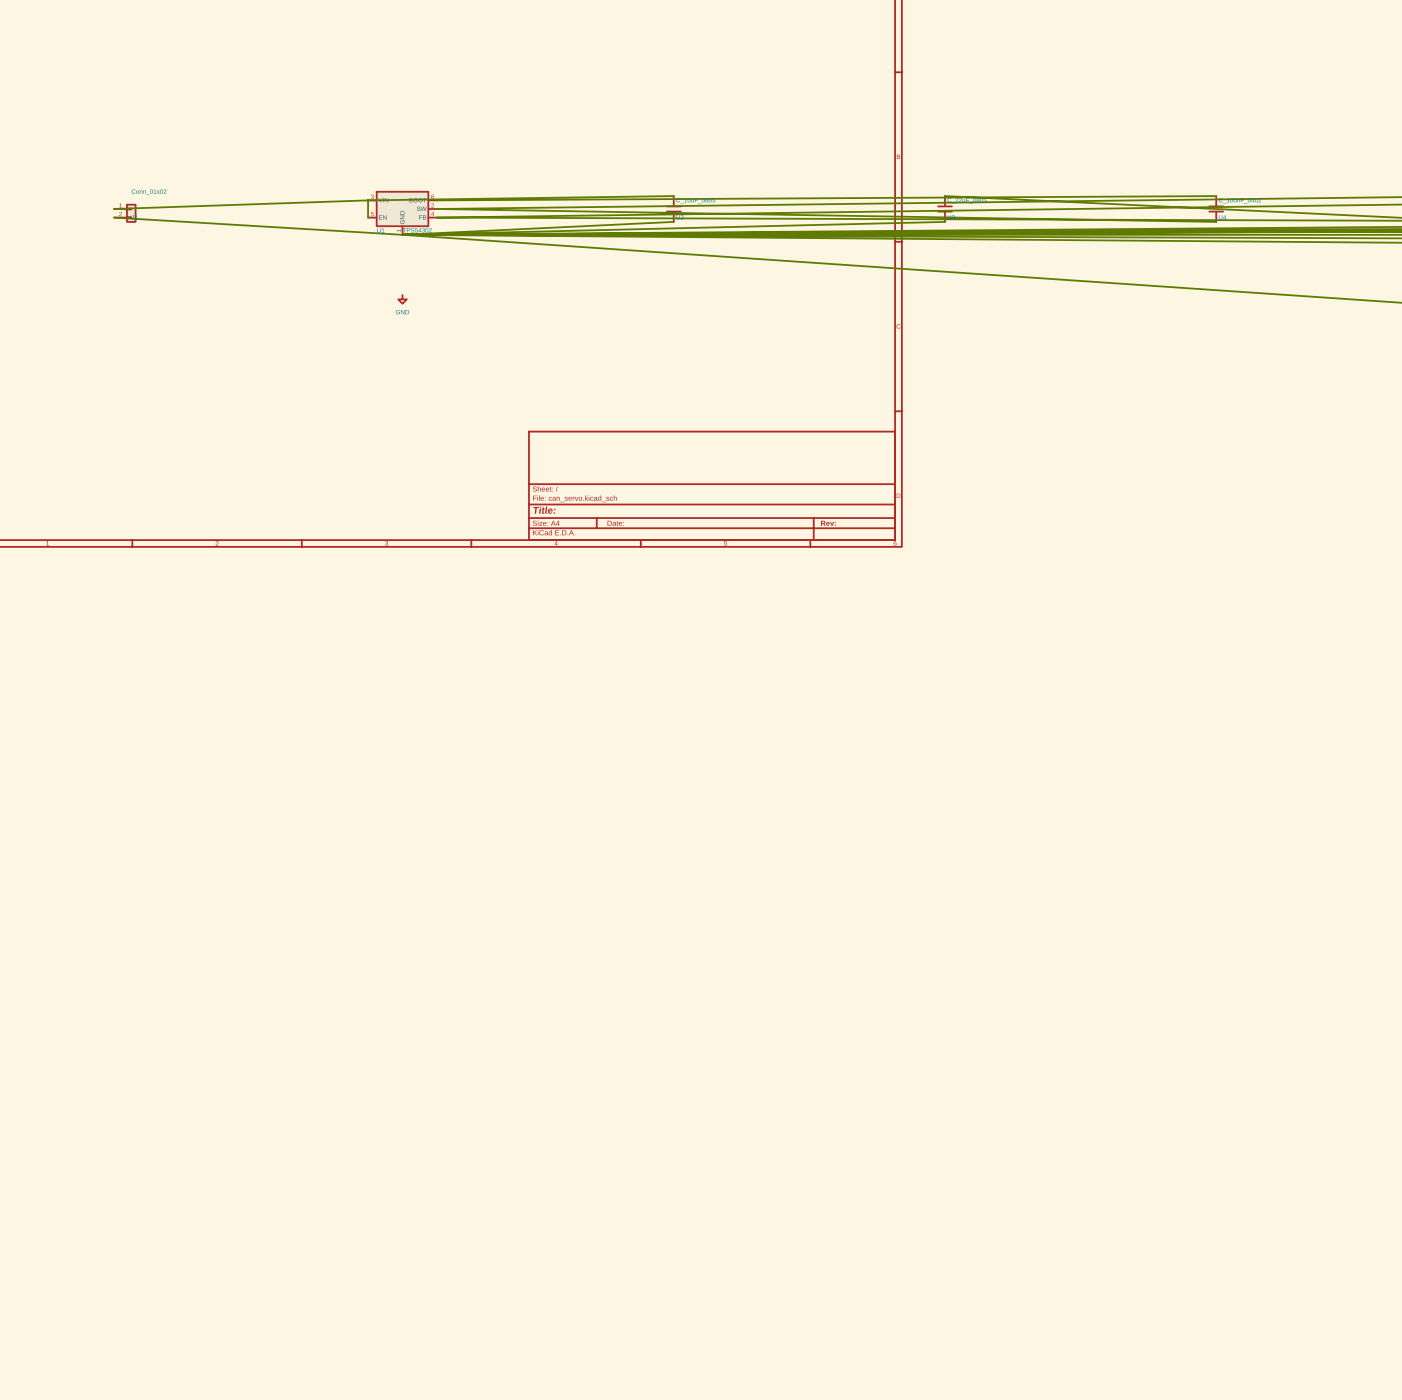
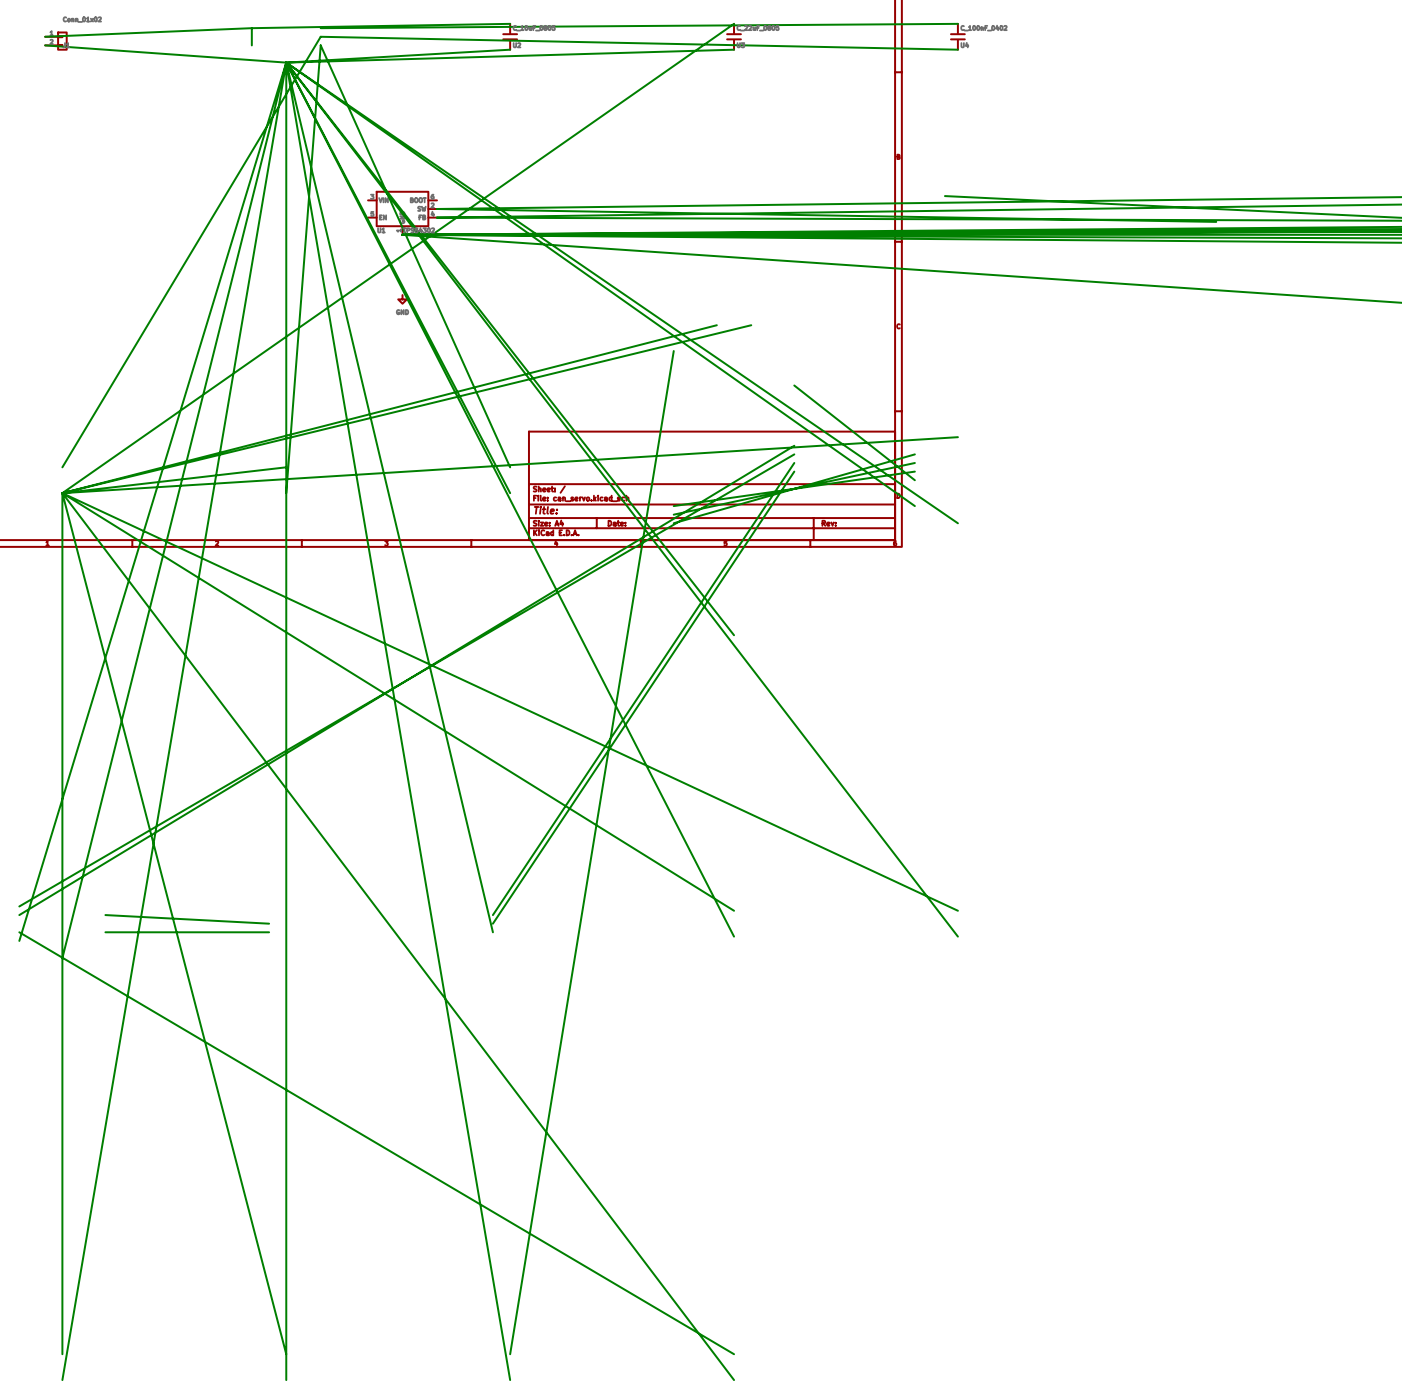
wire: none -> (510, 23) (251, 28)
wire: none -> (734, 23) (62, 493)
wire: none -> (957, 23) (320, 28)
wire: none -> (251, 28) (251, 45)
wire: none -> (251, 28) (45, 36)
wire: none -> (45, 45) (286, 62)
wire: none -> (510, 49) (286, 62)
wire: none -> (734, 49) (286, 62)
wire: none -> (957, 49) (320, 36) (62, 467)
wire: none -> (286, 62) (62, 1380)
wire: none -> (286, 62) (286, 1380)
wire: none -> (286, 62) (62, 958)
wire: none -> (286, 62) (19, 940)
wire: none -> (286, 62) (510, 493)
wire: none -> (286, 62) (734, 635)
wire: none -> (286, 62) (734, 936)
wire: none -> (286, 62) (510, 1380)
wire: none -> (286, 62) (914, 506)
wire: none -> (286, 62) (492, 932)
wire: none -> (286, 62) (957, 936)
wire: none -> (286, 62) (957, 523)
wire: (673, 196) (368, 200) -> none
wire: (1216, 196) (436, 200) -> none
wire: (368, 200) (368, 217) -> none
wire: (368, 200) (114, 208) -> none
part position: (673, 208) -> (510, 36)
part position: (944, 208) -> (734, 36)
part position: (1216, 208) -> (957, 36)
part position: (125, 213) -> (56, 41)
wire: (114, 217) (402, 234) -> none
wire: (673, 221) (402, 234) -> none
wire: (944, 221) (402, 234) -> none
wire: none -> (716, 325) (62, 493)
wire: none -> (751, 325) (62, 493)
wire: none -> (673, 351) (510, 1354)
wire: none -> (794, 385) (914, 480)
wire: none -> (957, 437) (62, 493)
wire: none -> (794, 445) (19, 915)
wire: none -> (794, 454) (19, 906)
wire: none -> (914, 454) (673, 523)
wire: none -> (794, 463) (492, 915)
wire: none -> (914, 463) (673, 514)
wire: none -> (286, 467) (62, 493)
wire: none -> (510, 467) (320, 45) (286, 493)
wire: none -> (794, 471) (492, 923)
wire: none -> (914, 471) (673, 506)
wire: none -> (62, 493) (734, 910)
wire: none -> (62, 493) (957, 910)
wire: none -> (62, 493) (62, 1354)
wire: none -> (62, 493) (286, 1354)
wire: none -> (62, 493) (734, 1380)
wire: none -> (105, 915) (269, 923)
wire: none -> (19, 932) (734, 1354)
wire: none -> (105, 932) (269, 932)

